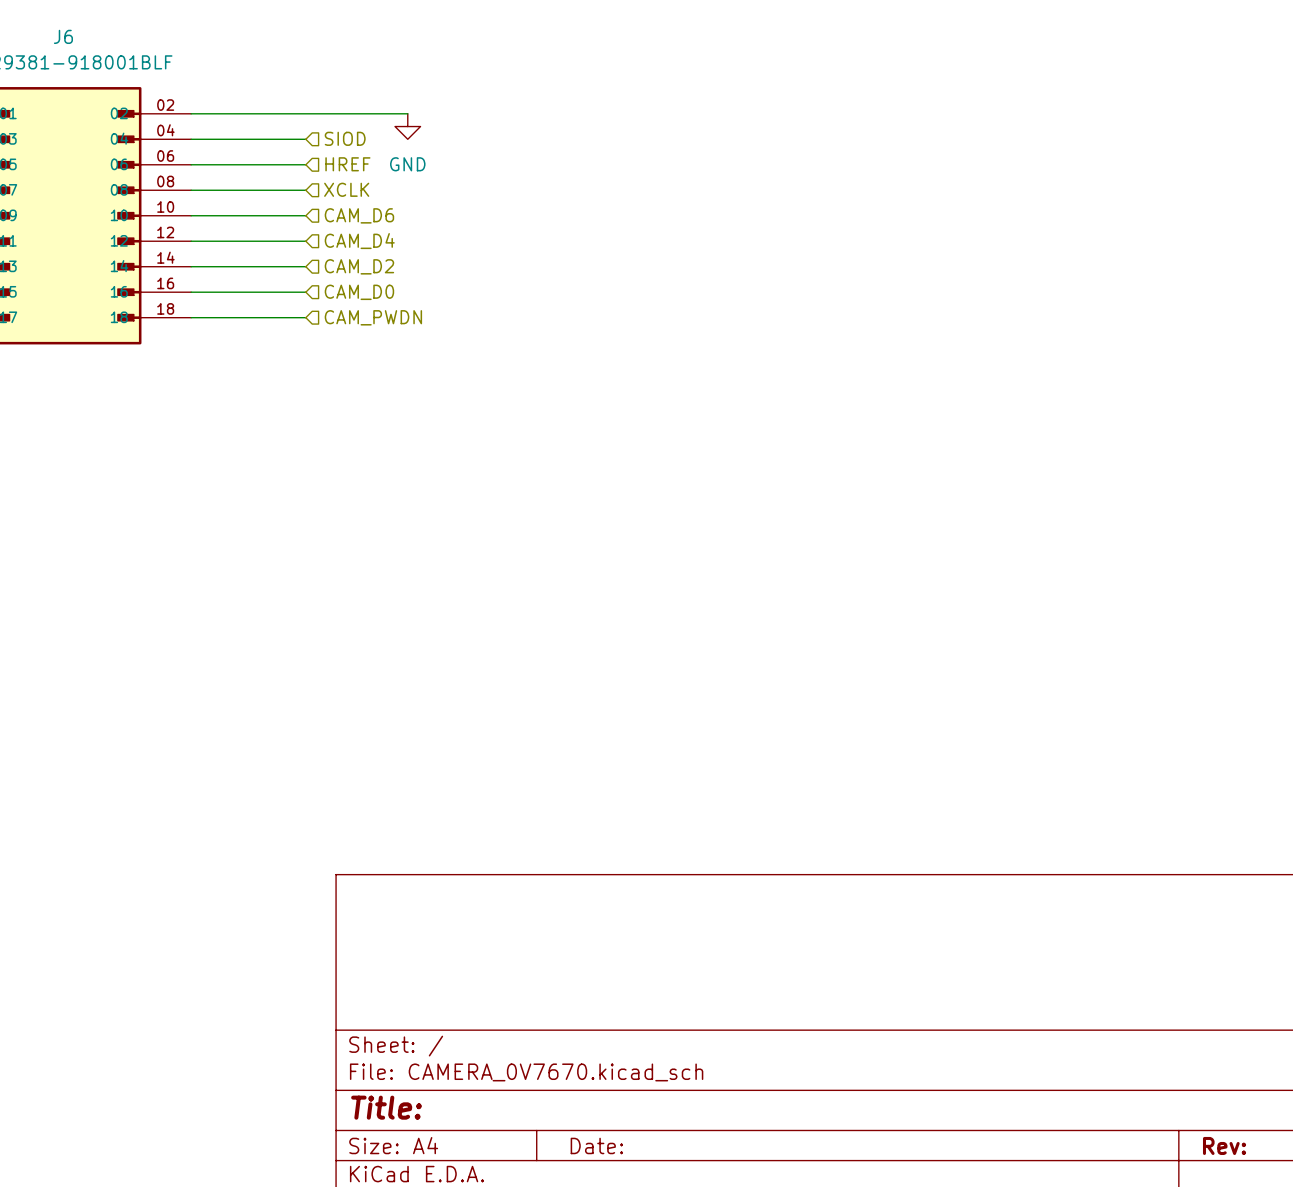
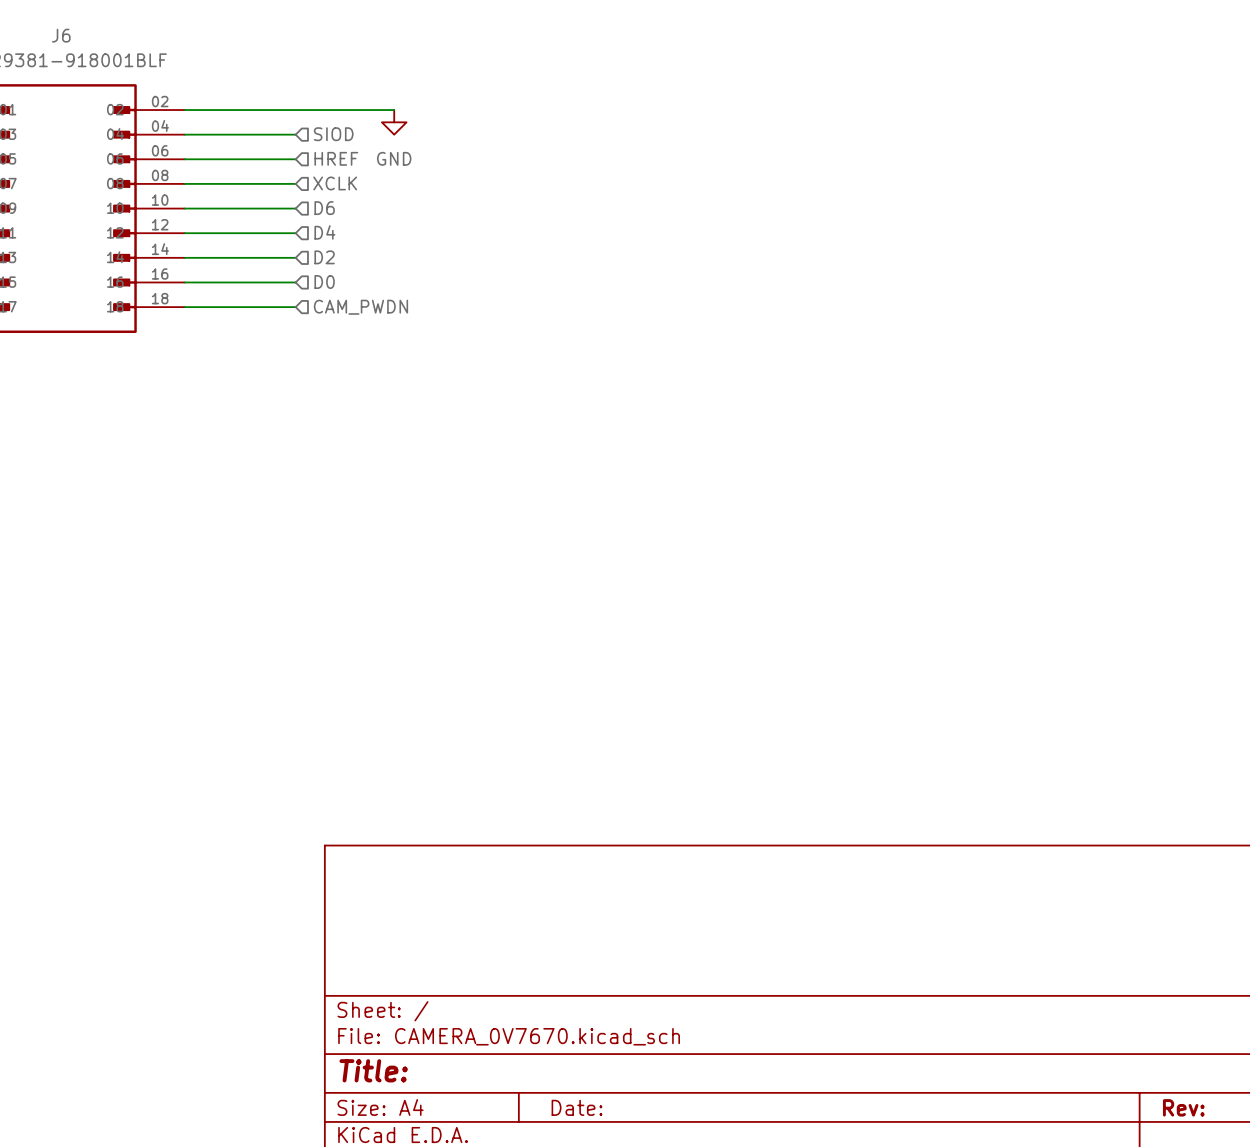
hierarchical label: CAM_D6 (359, 215) -> D6 (324, 208)
hierarchical label: CAM_D4 (359, 241) -> D4 (324, 232)
hierarchical label: CAM_D2 (359, 266) -> D2 (324, 257)
hierarchical label: CAM_D0 (359, 292) -> D0 (324, 282)

